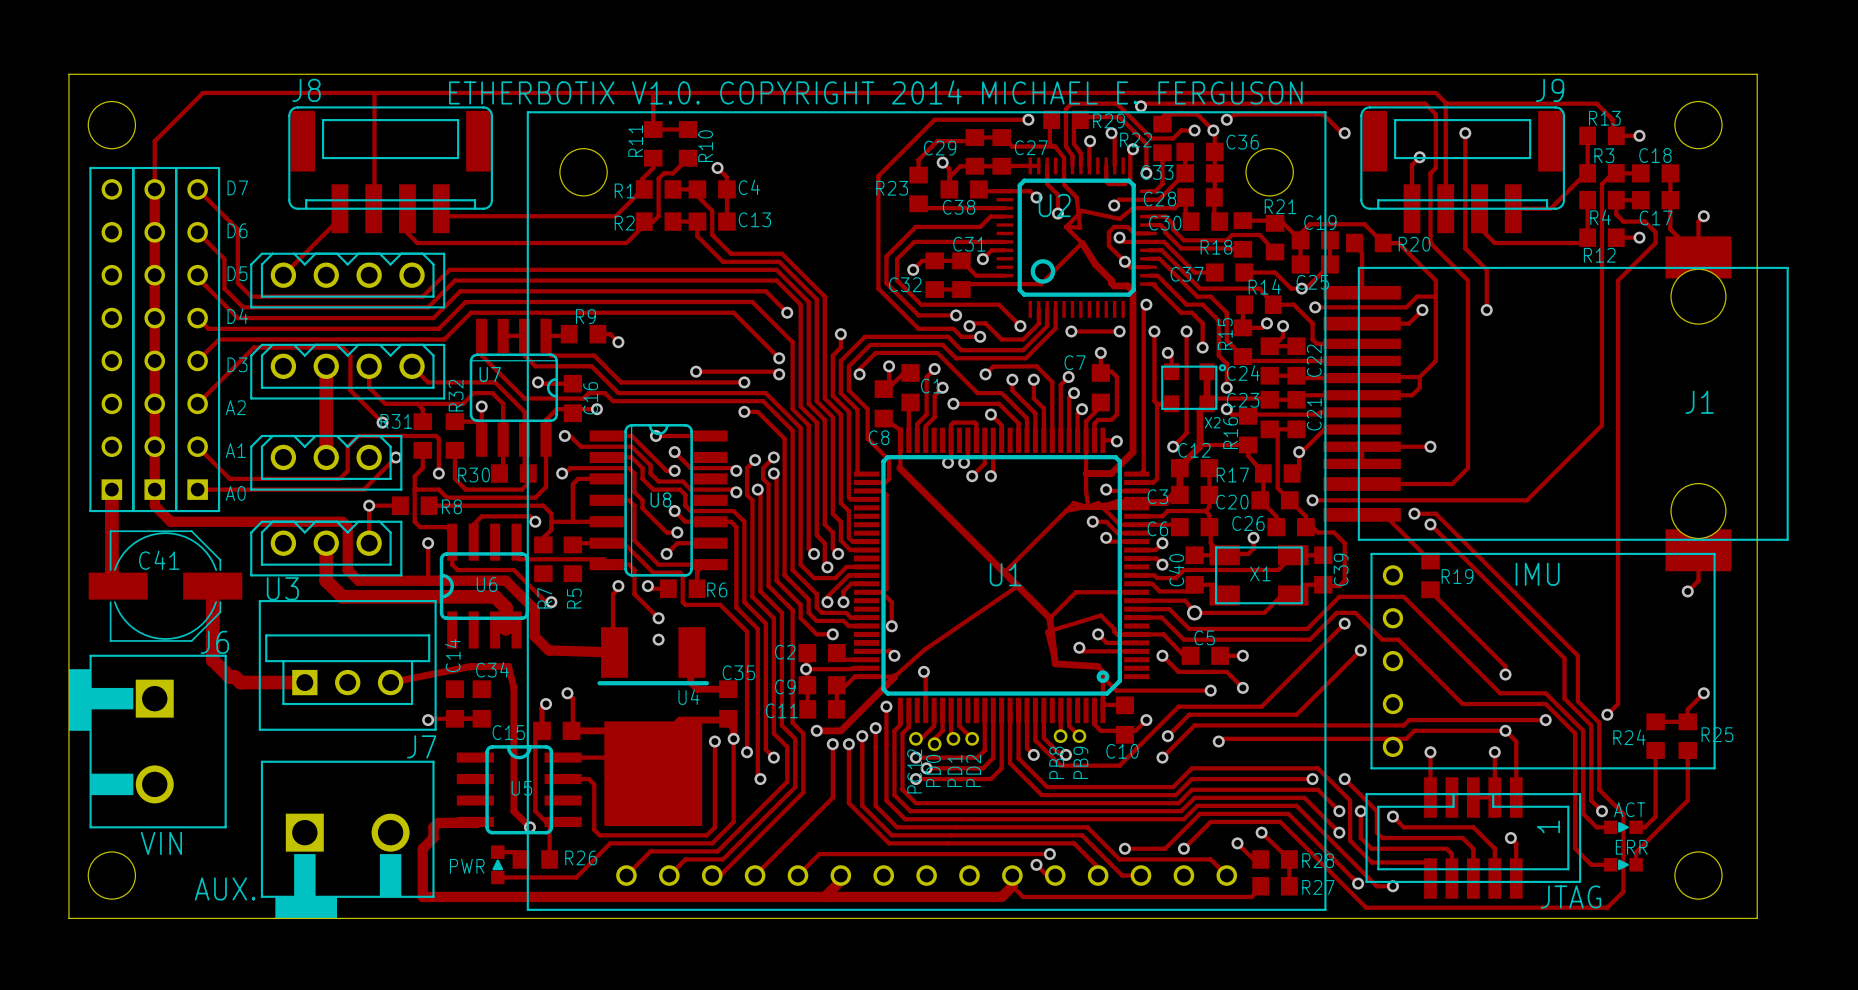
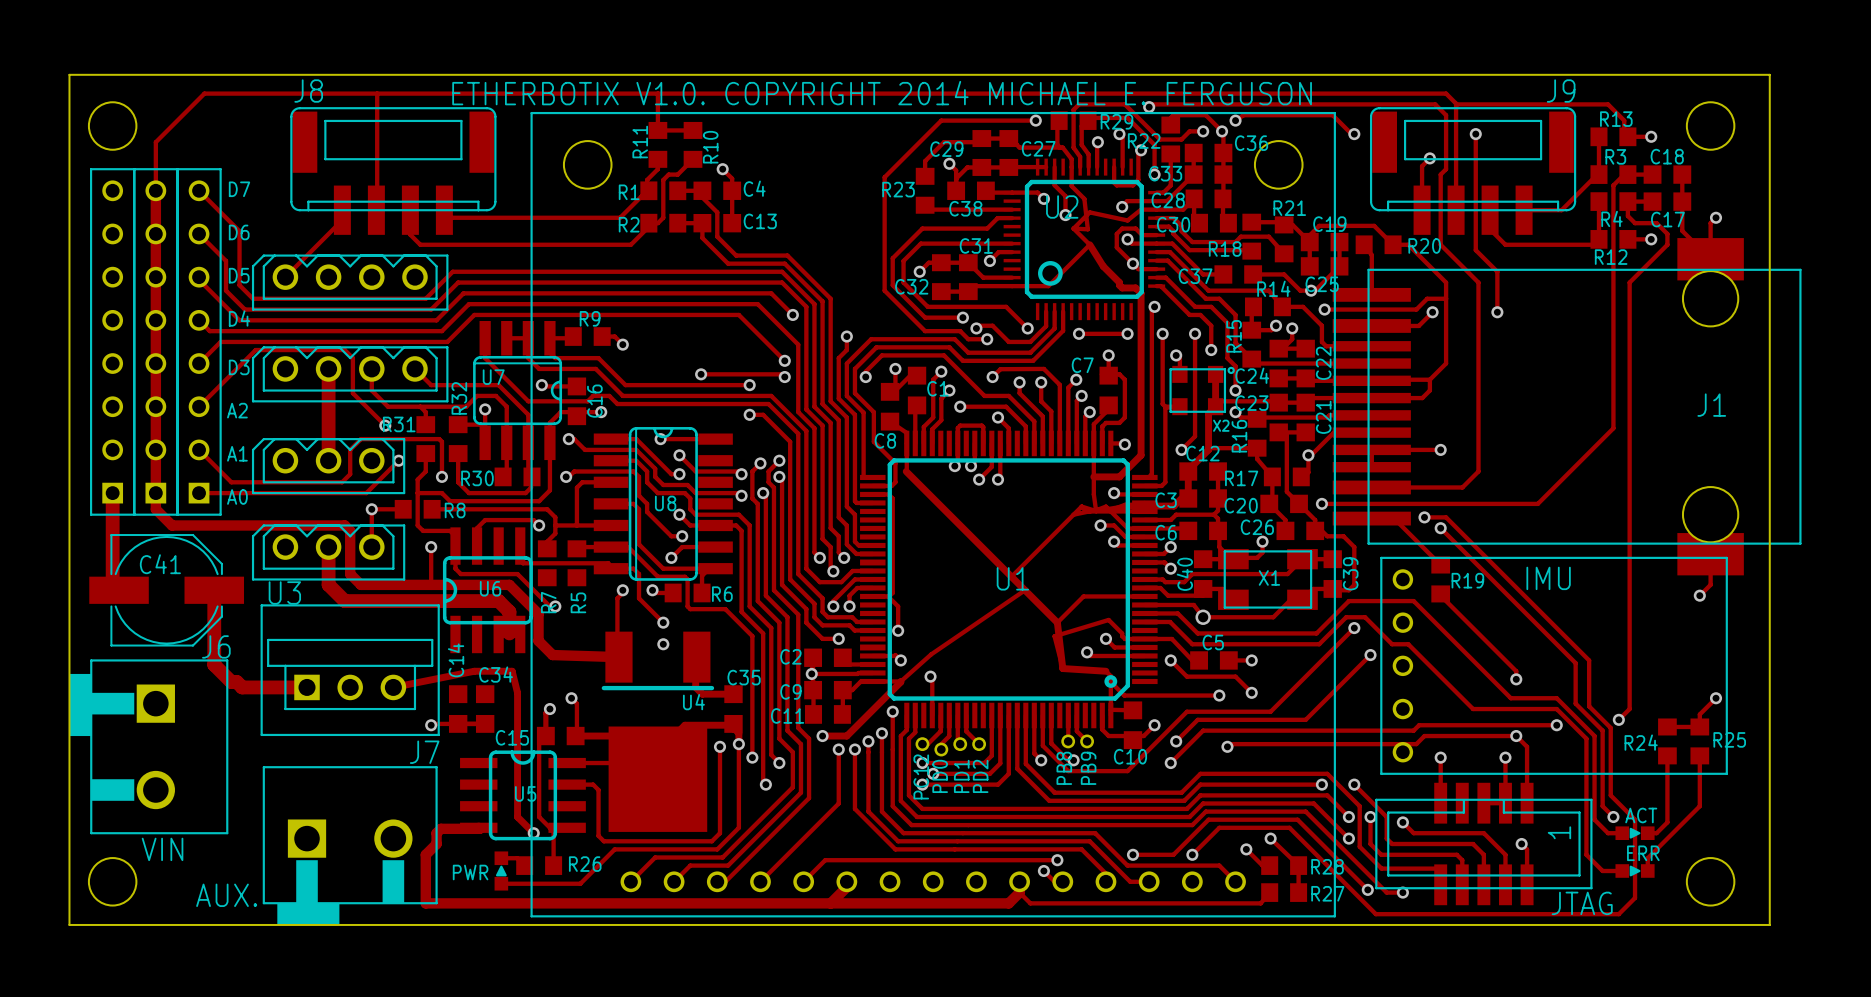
part footprint: [526, 111, 1327, 911] -> [530, 111, 1336, 918]

